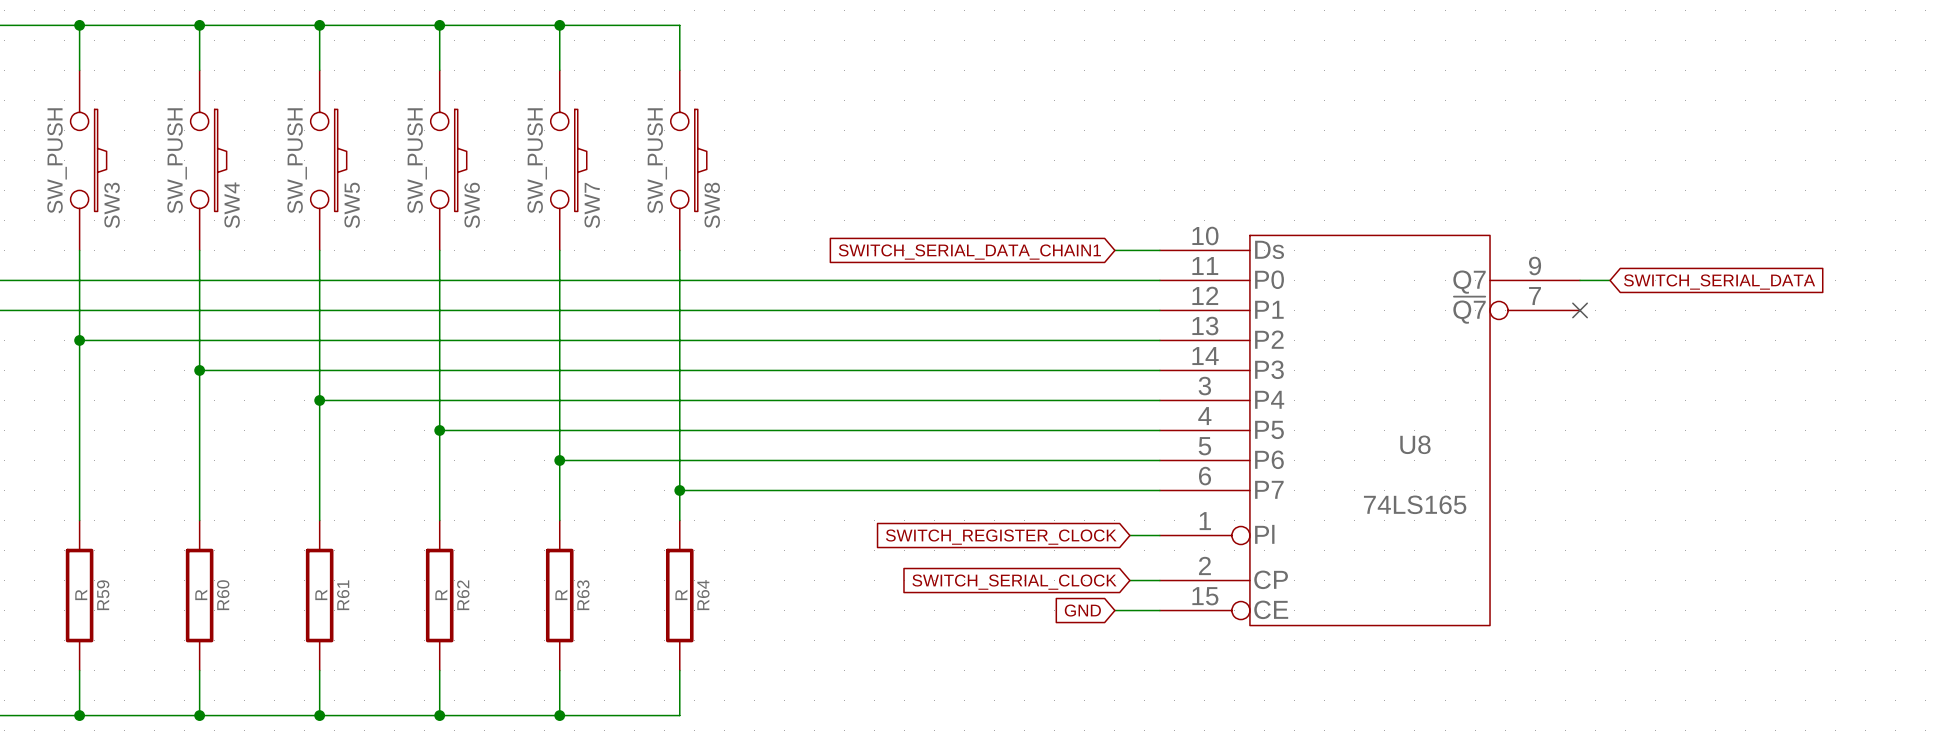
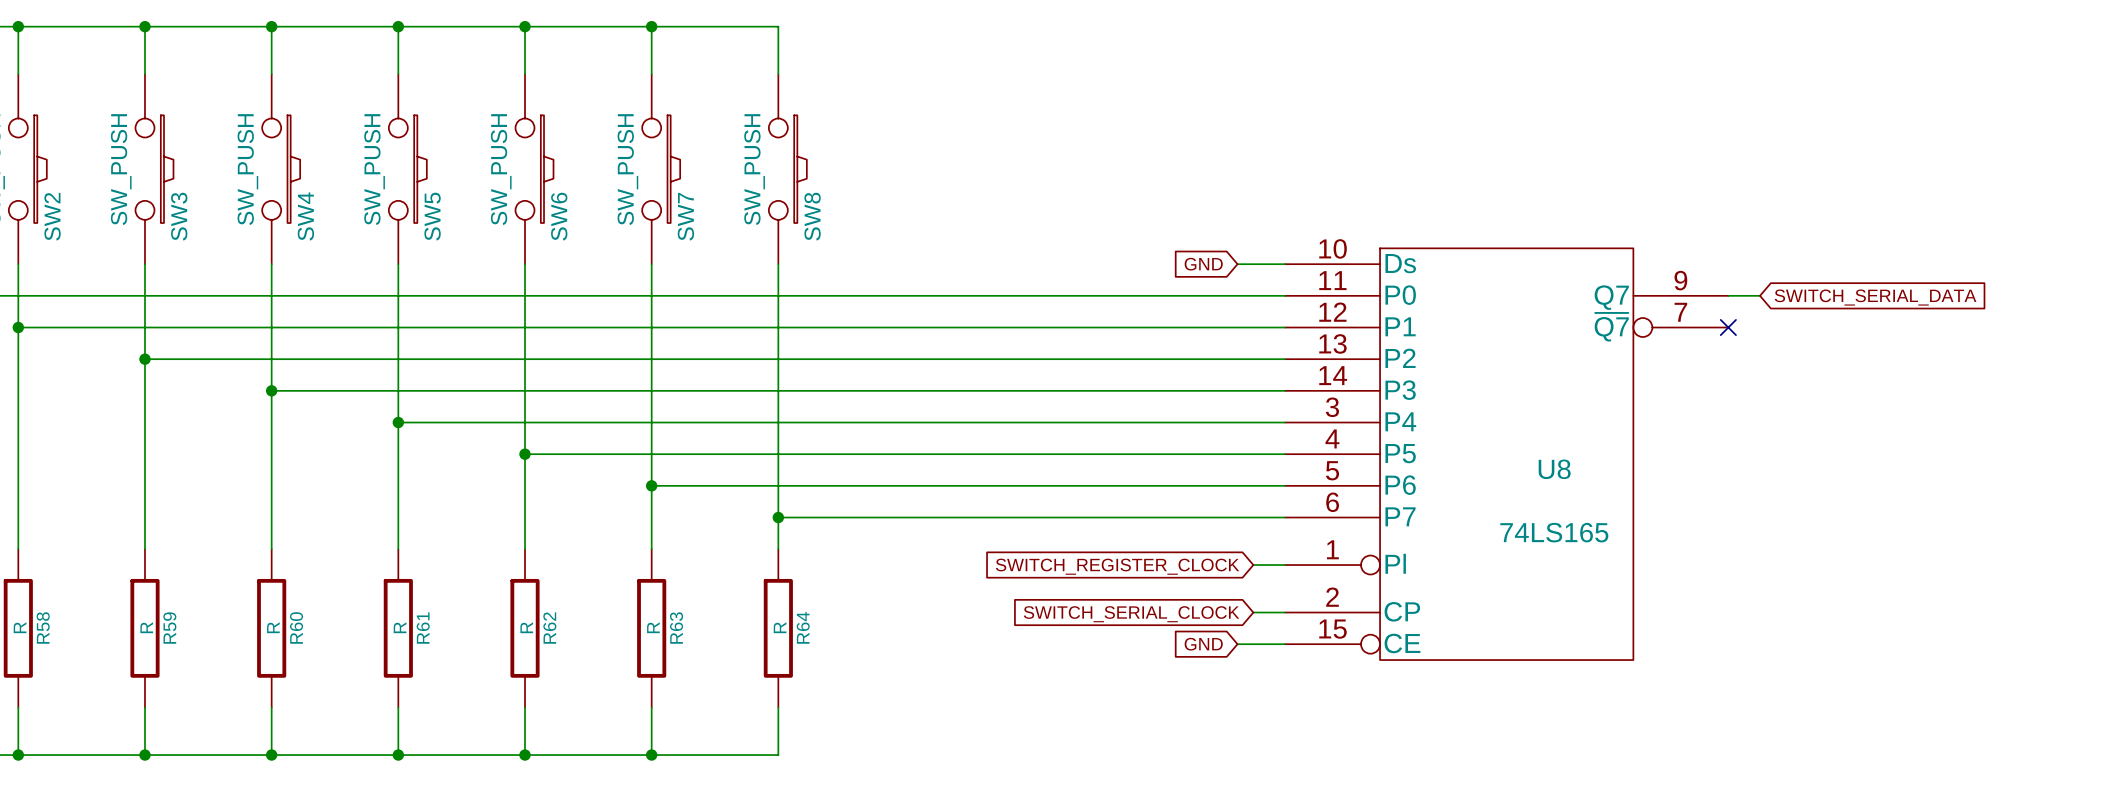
global label: SWITCH_SERIAL_DATA_CHAIN1 (969, 252) -> GND (1203, 264)

